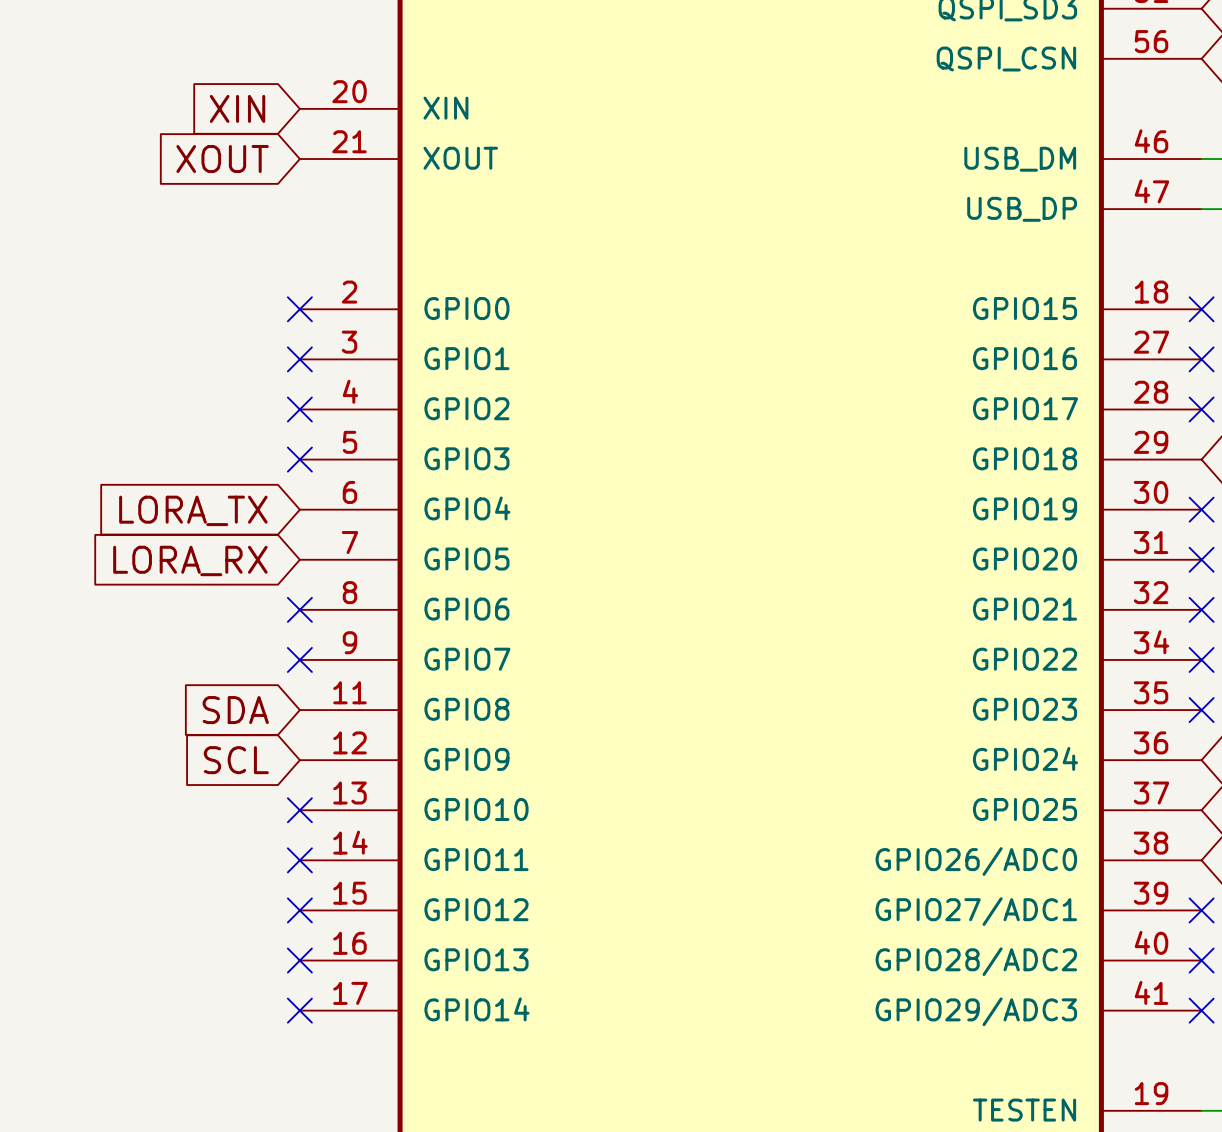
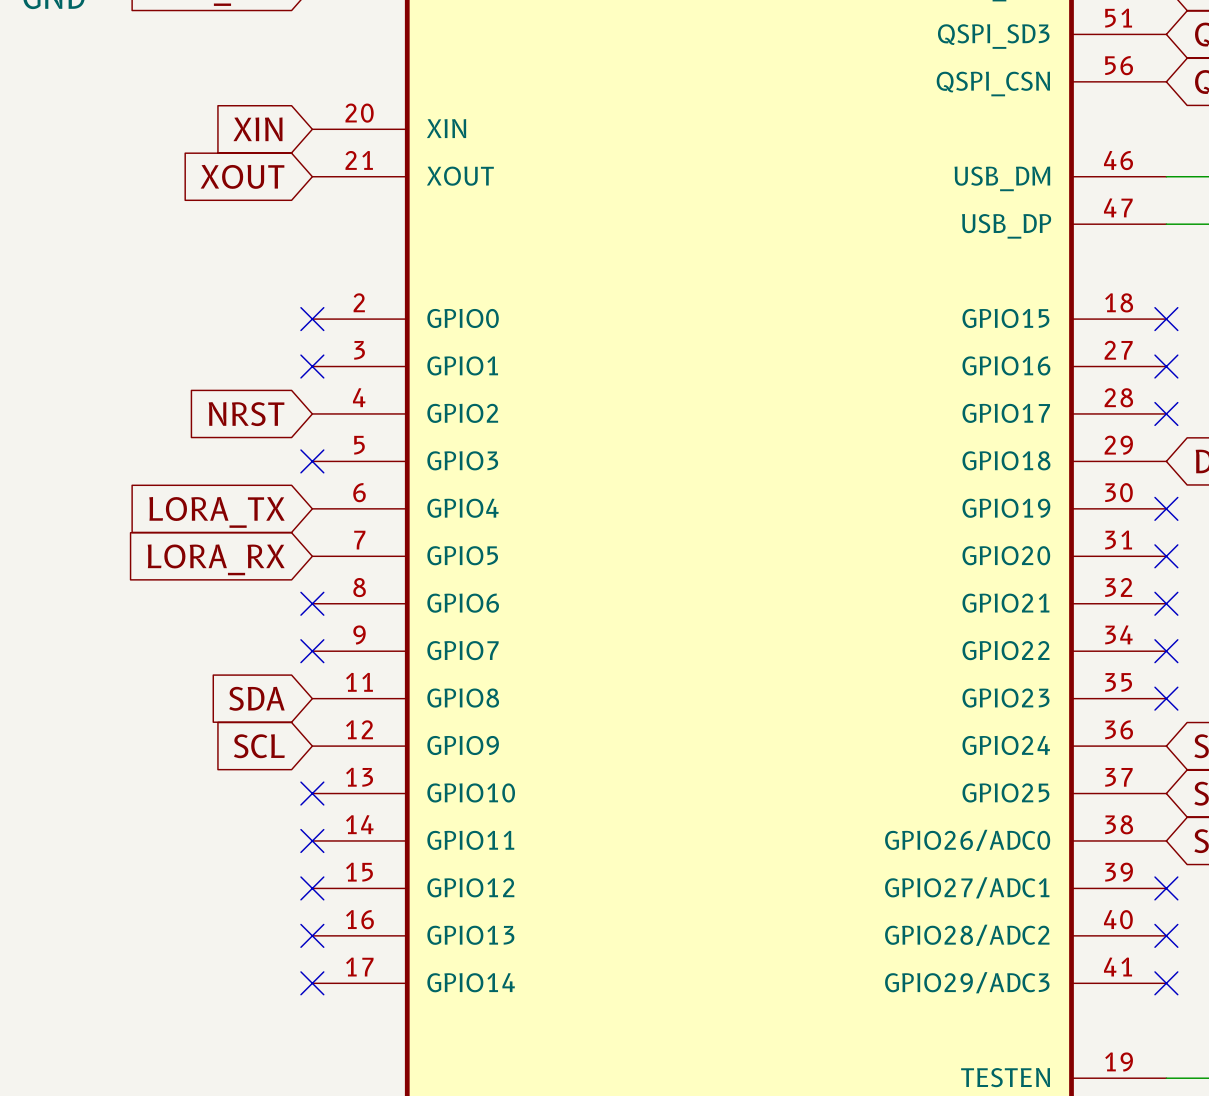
global label: none -> NRST (246, 414)
no-connect mark: (299, 409) -> none

